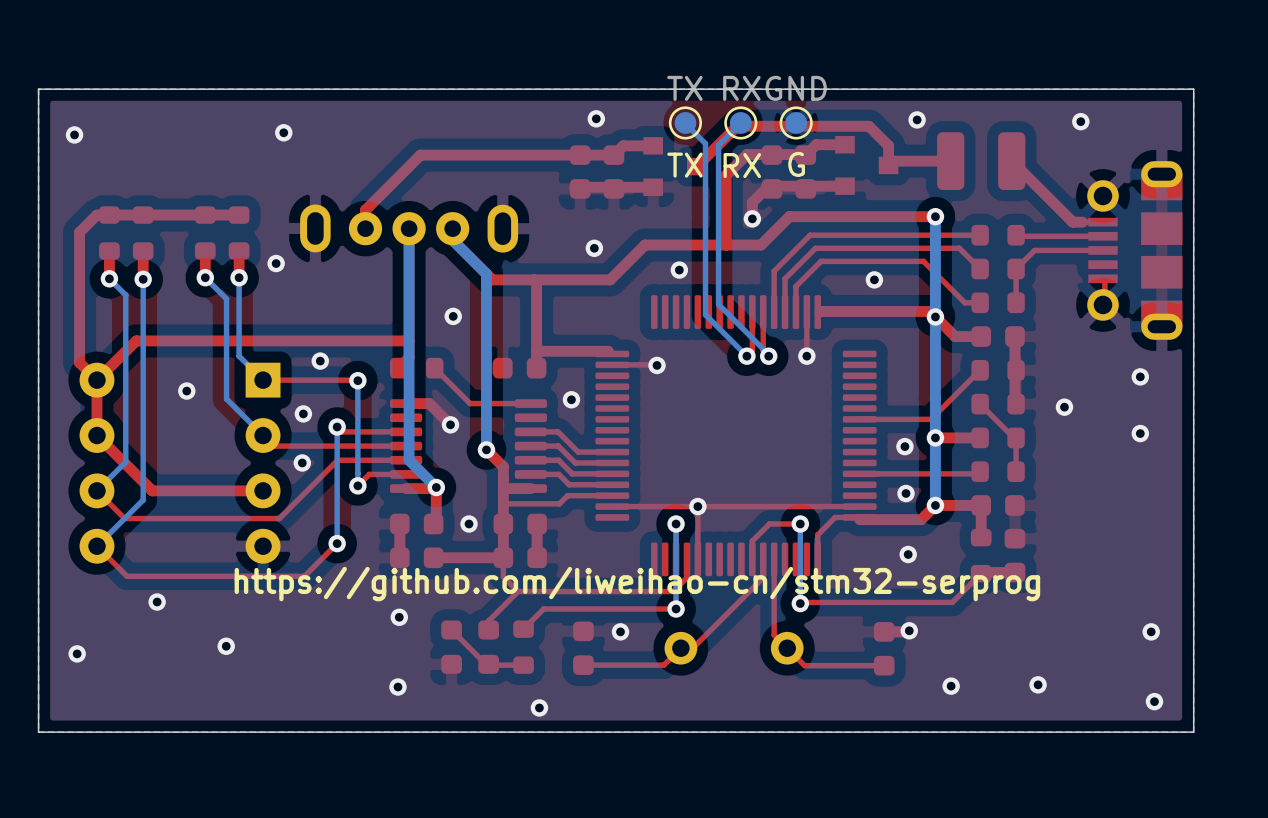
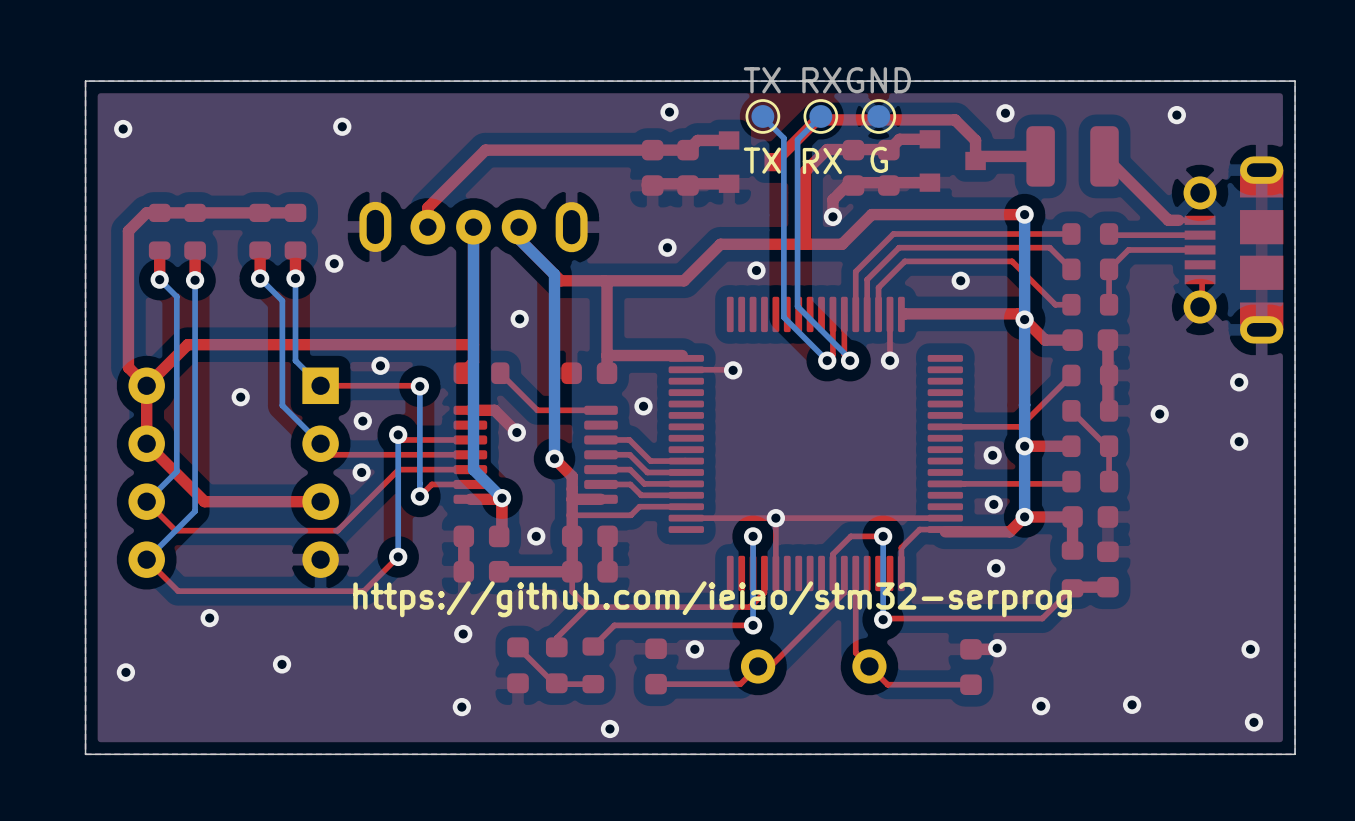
text: https://github.com/liweihao-cn/stm32-serprog (637, 584) -> https://github.com/ieiao/stm32-serprog (712, 599)

